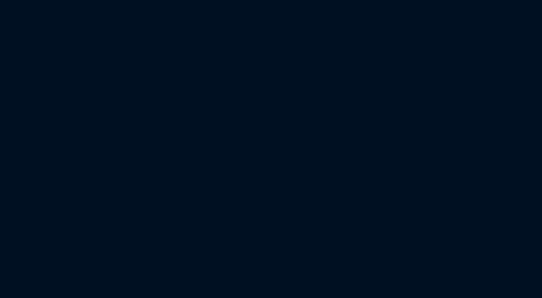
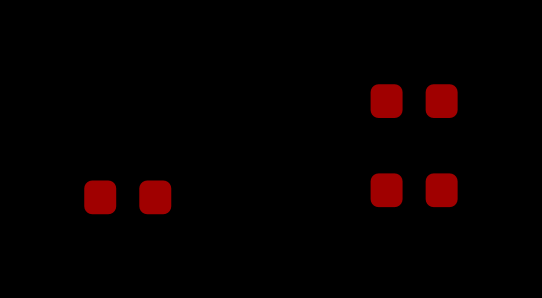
part: none -> (414, 101)
part: none -> (414, 190)
part: none -> (127, 197)

